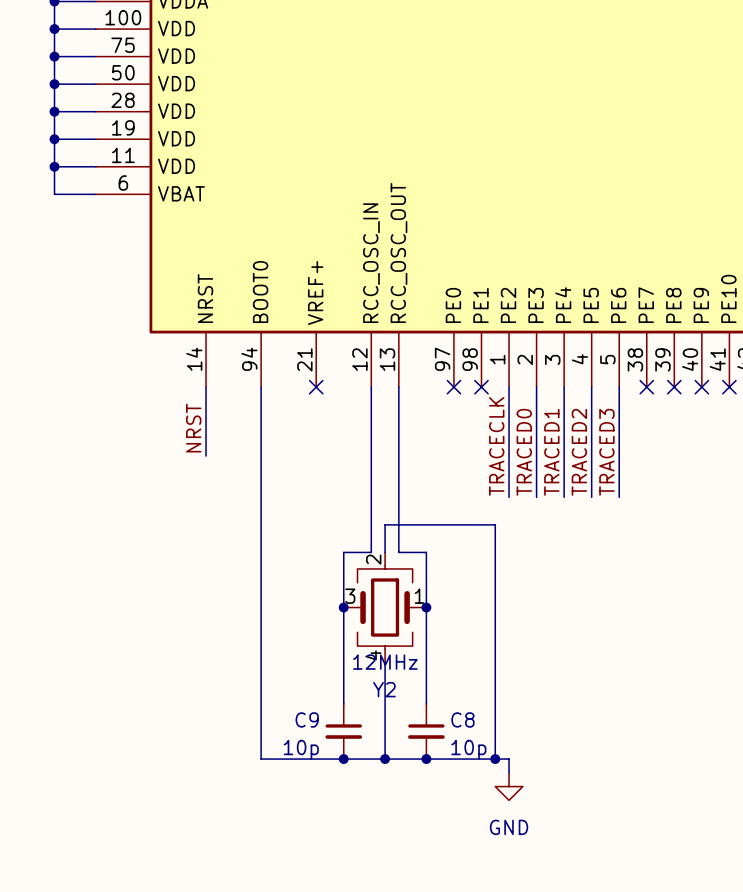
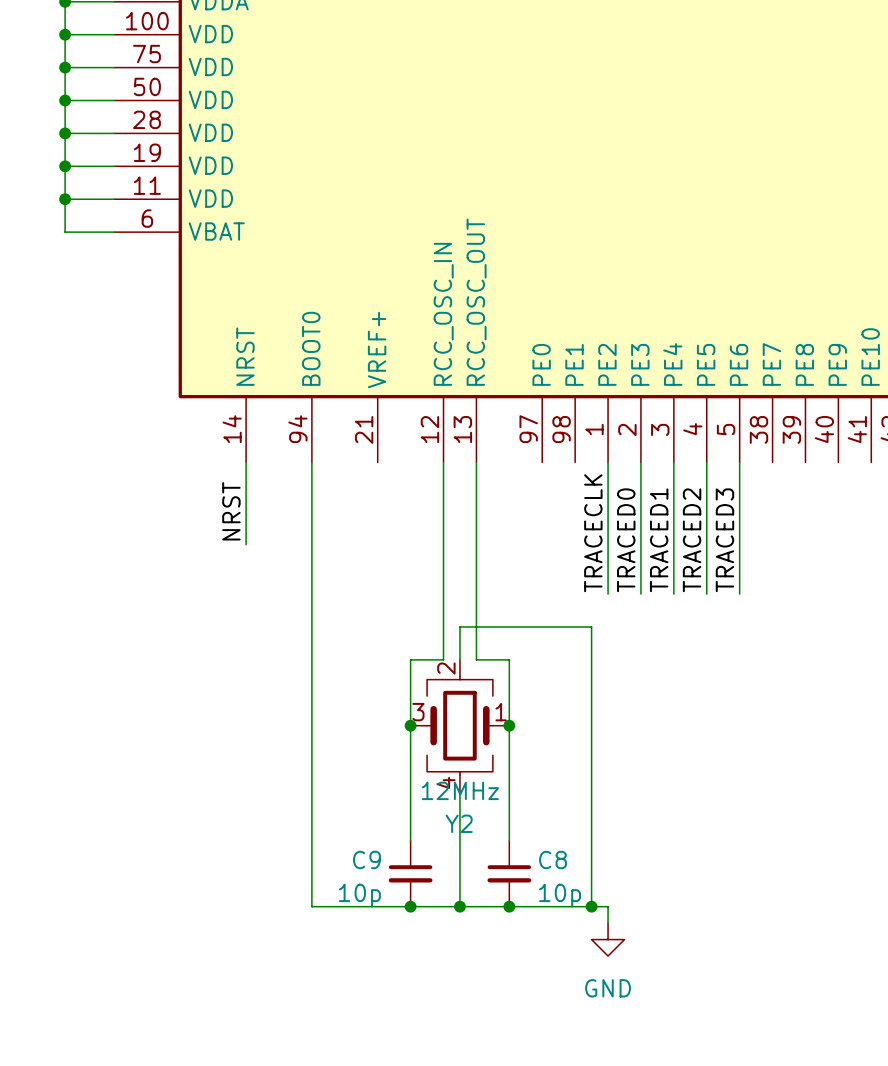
no-connect mark: (316, 387) -> none
no-connect mark: (453, 387) -> none
no-connect mark: (481, 387) -> none
no-connect mark: (646, 387) -> none
no-connect mark: (674, 387) -> none
no-connect mark: (701, 387) -> none
no-connect mark: (729, 387) -> none

